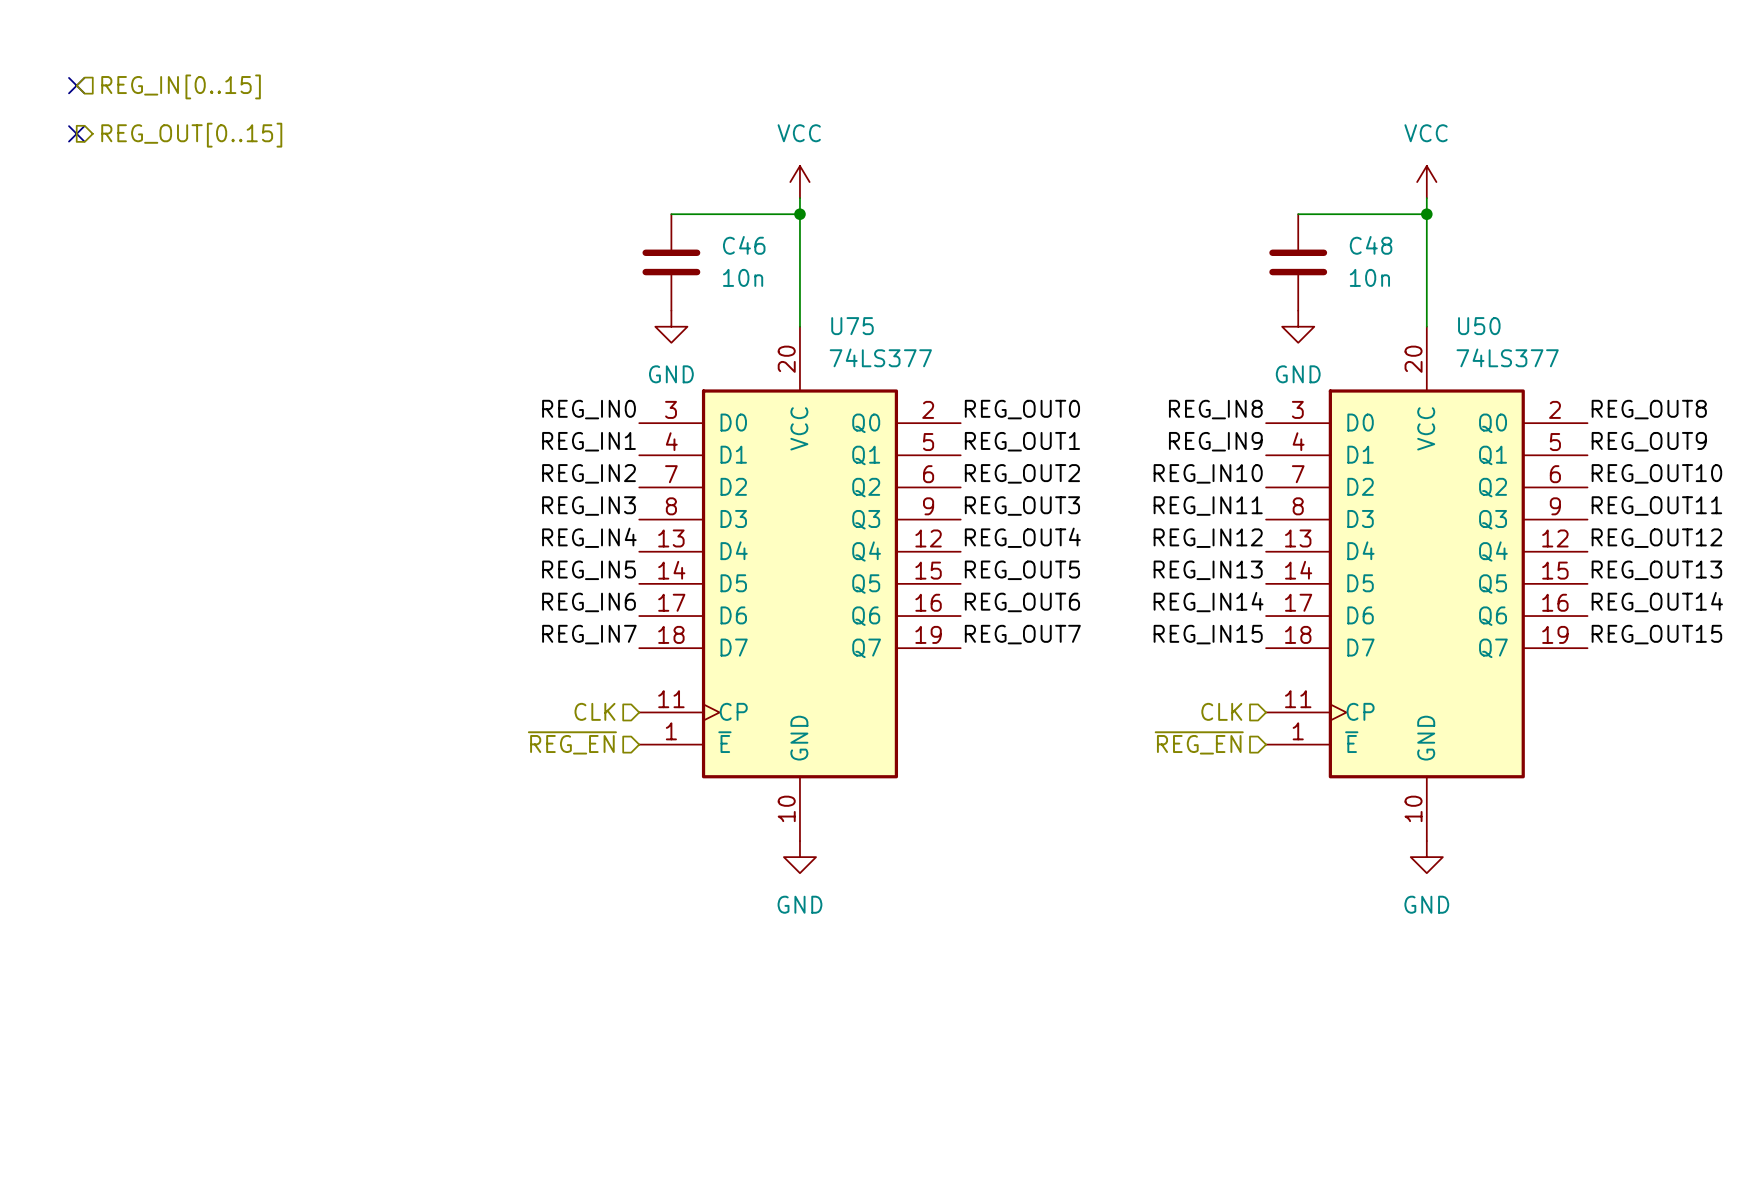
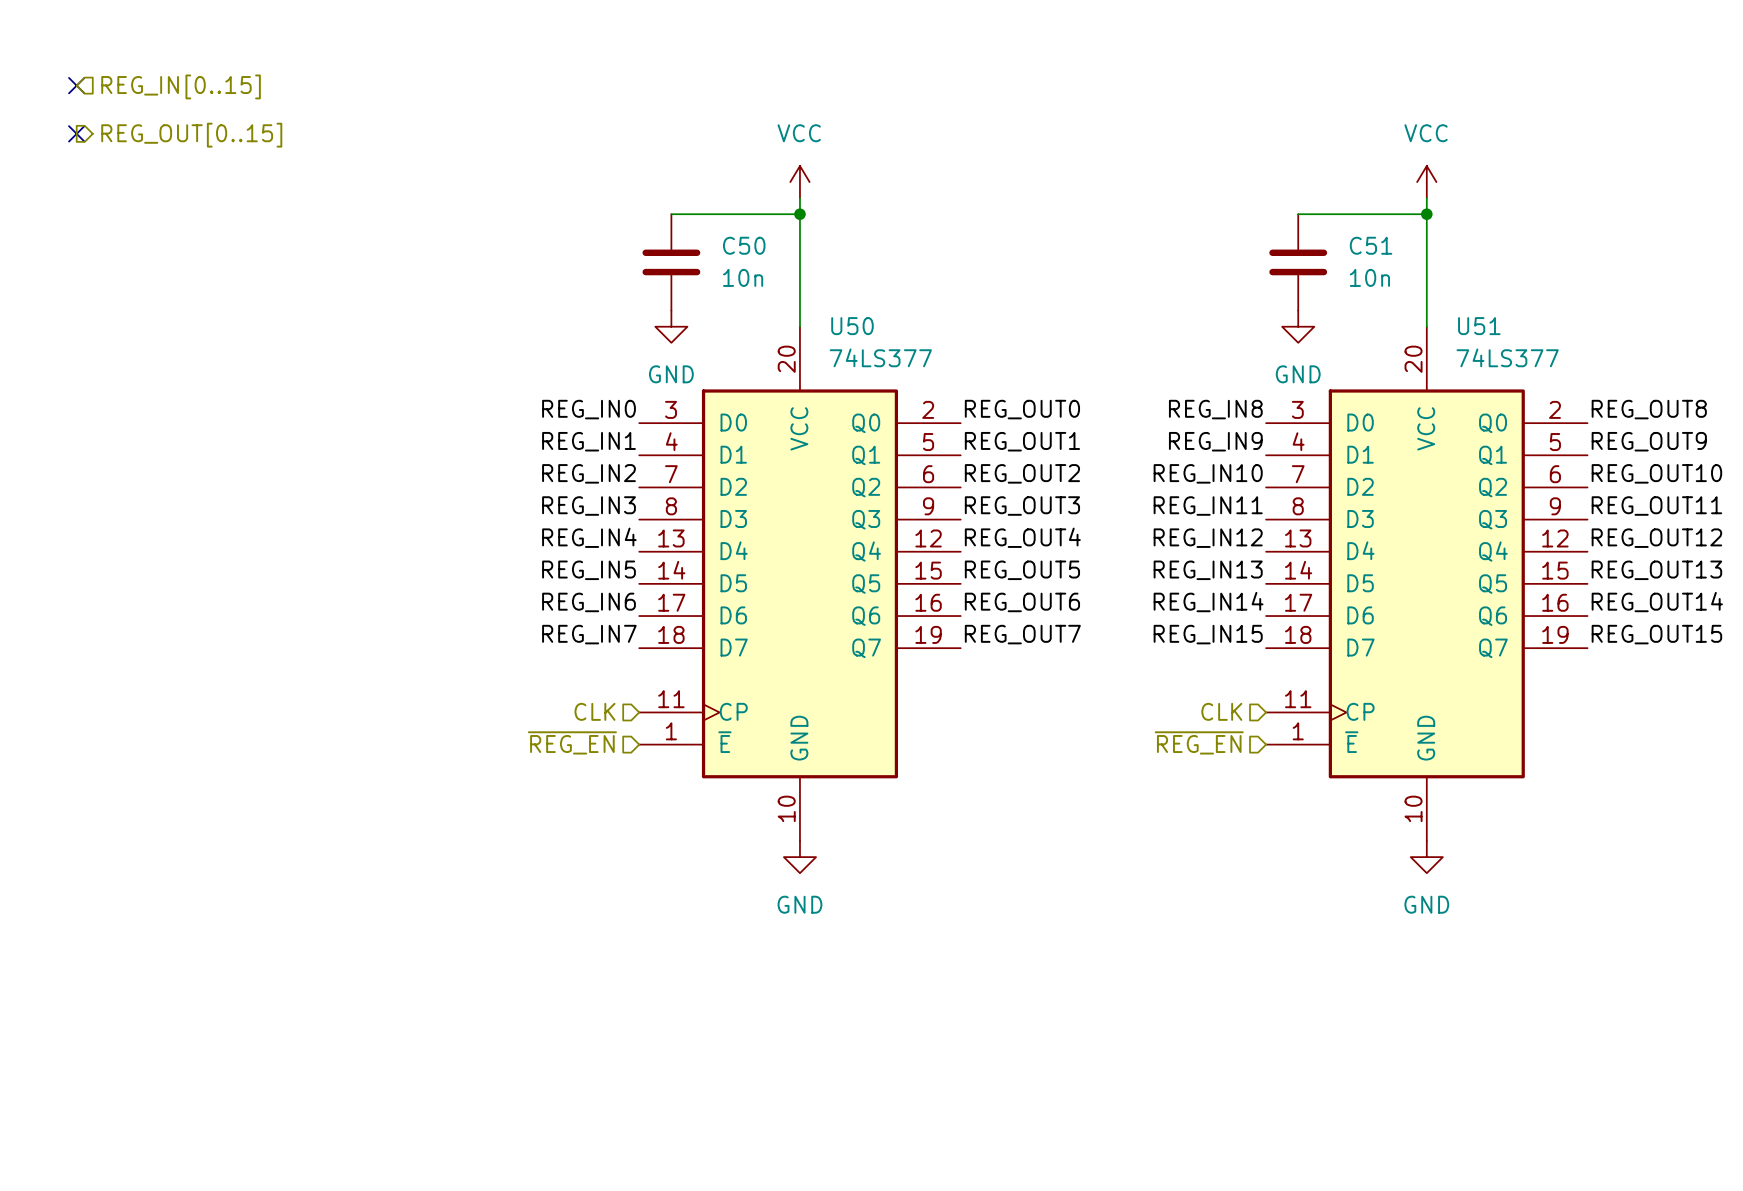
C46 name: C46 (744, 245) -> C50 (744, 245)
C48 name: C48 (1371, 245) -> C51 (1371, 245)
U75 name: U75 (852, 326) -> U50 (852, 326)
U50 name: U50 (1479, 326) -> U51 (1479, 326)

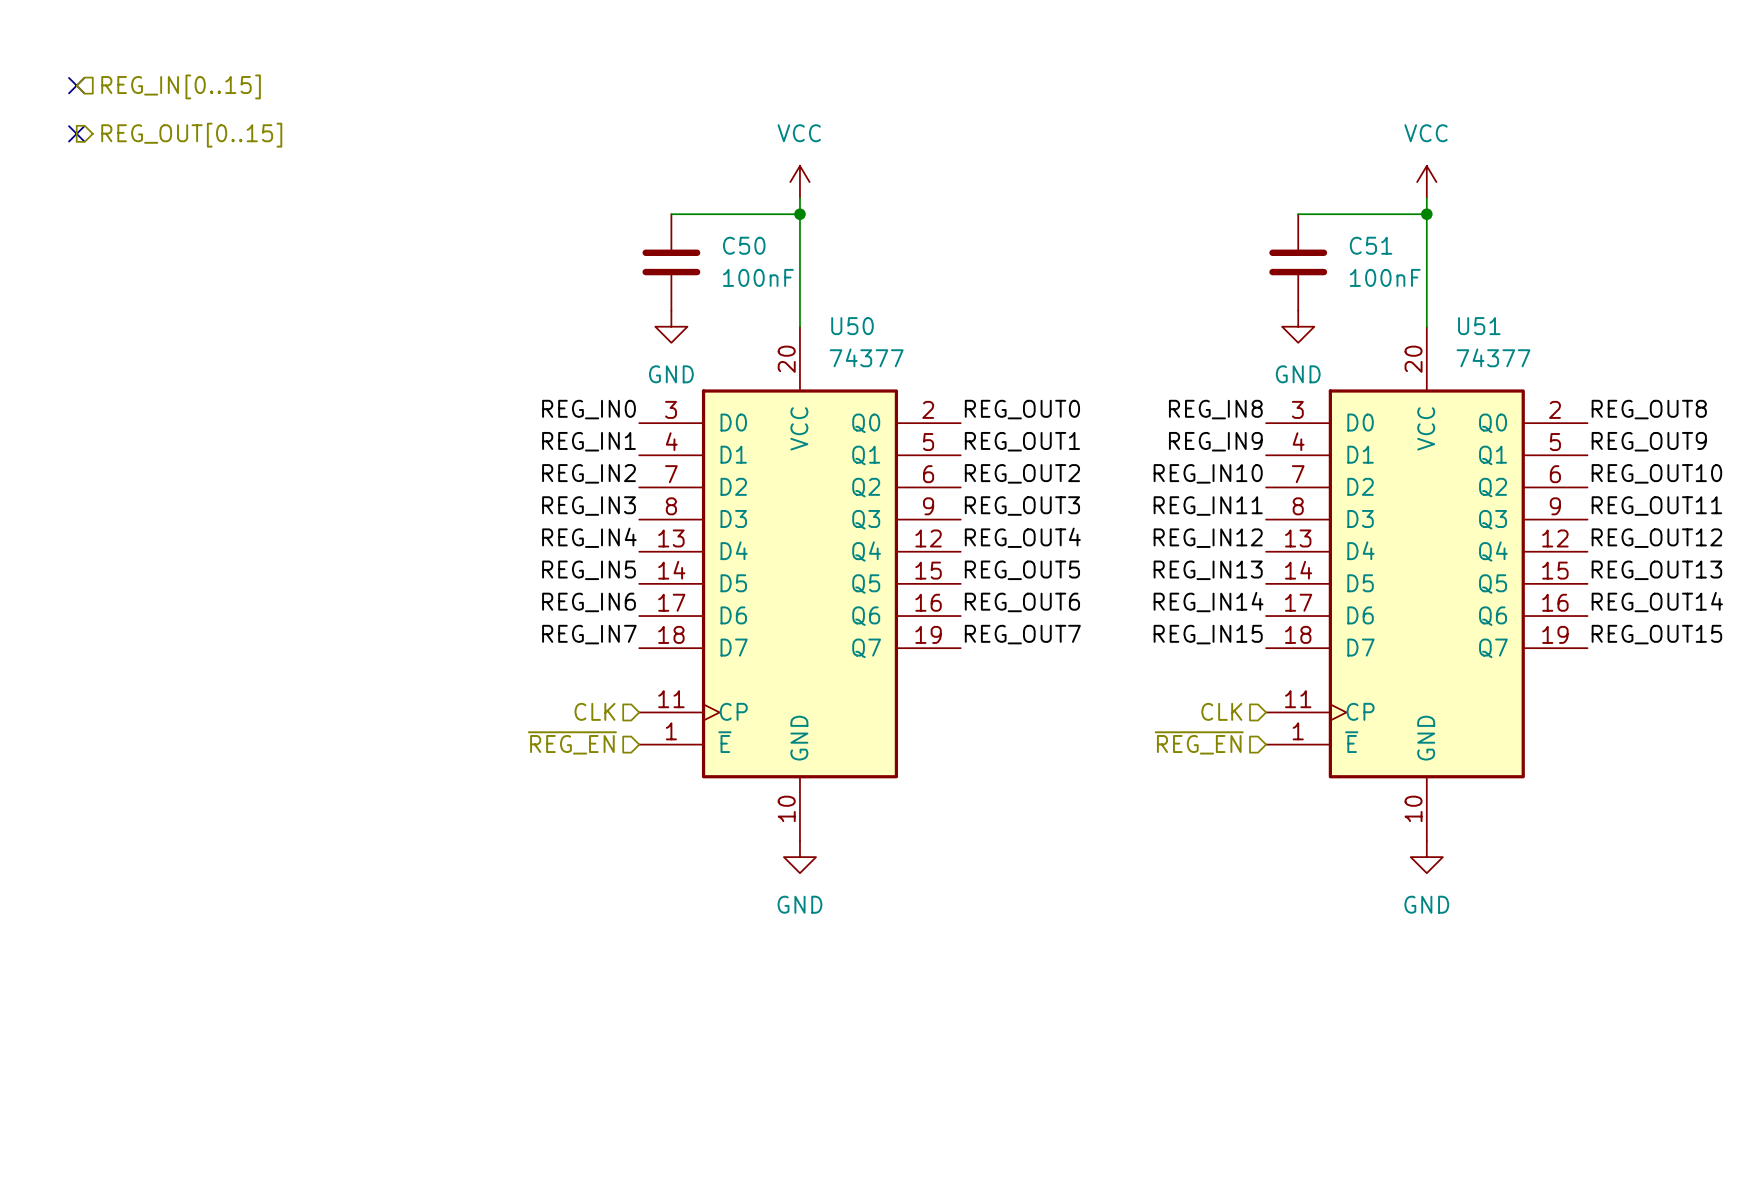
C50 value: 10n (743, 277) -> 100nF (758, 277)
C51 value: 10n (1369, 277) -> 100nF (1385, 277)
U50 value: 74LS377 (880, 357) -> 74377 (866, 357)
U51 value: 74LS377 (1507, 357) -> 74377 (1493, 357)

